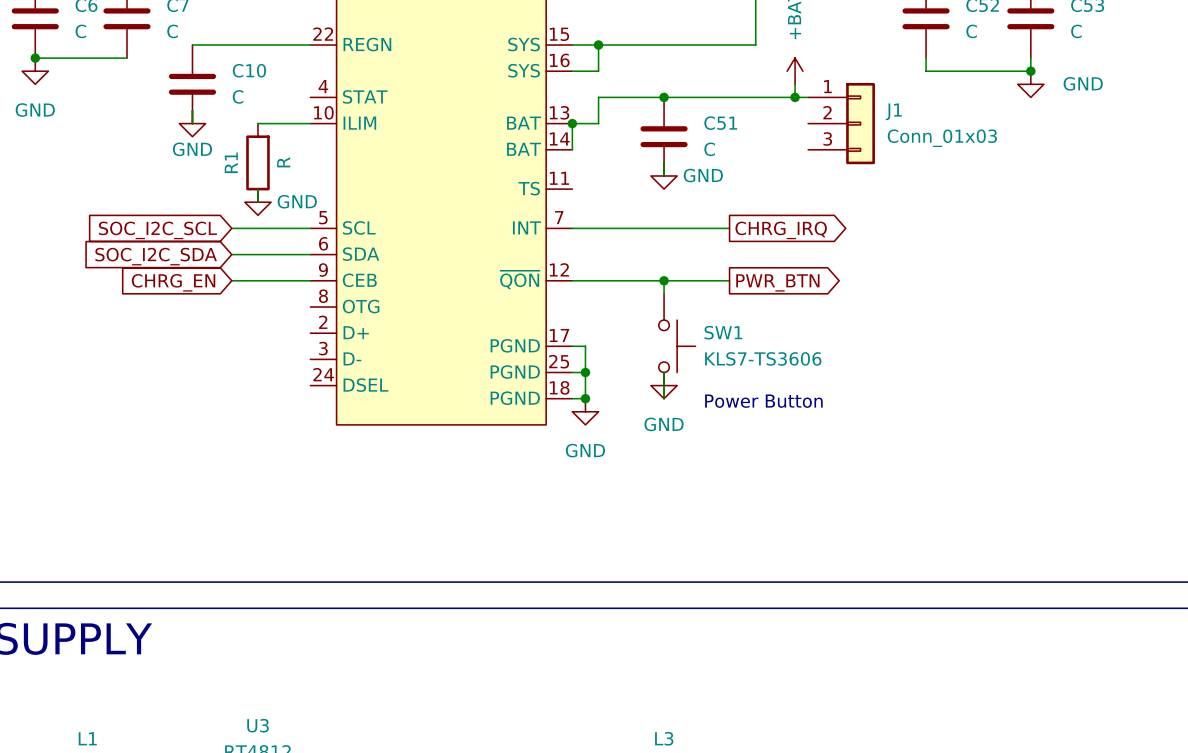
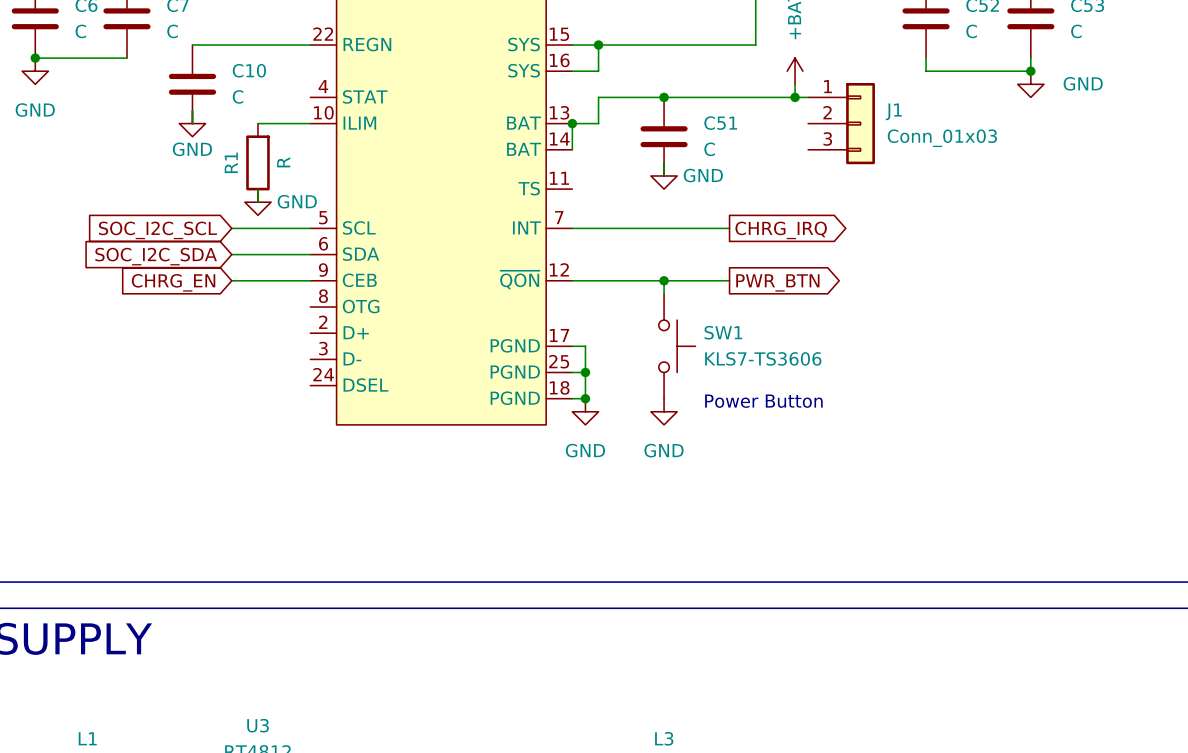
power symbol position: GND (664, 385) -> GND (664, 411)

